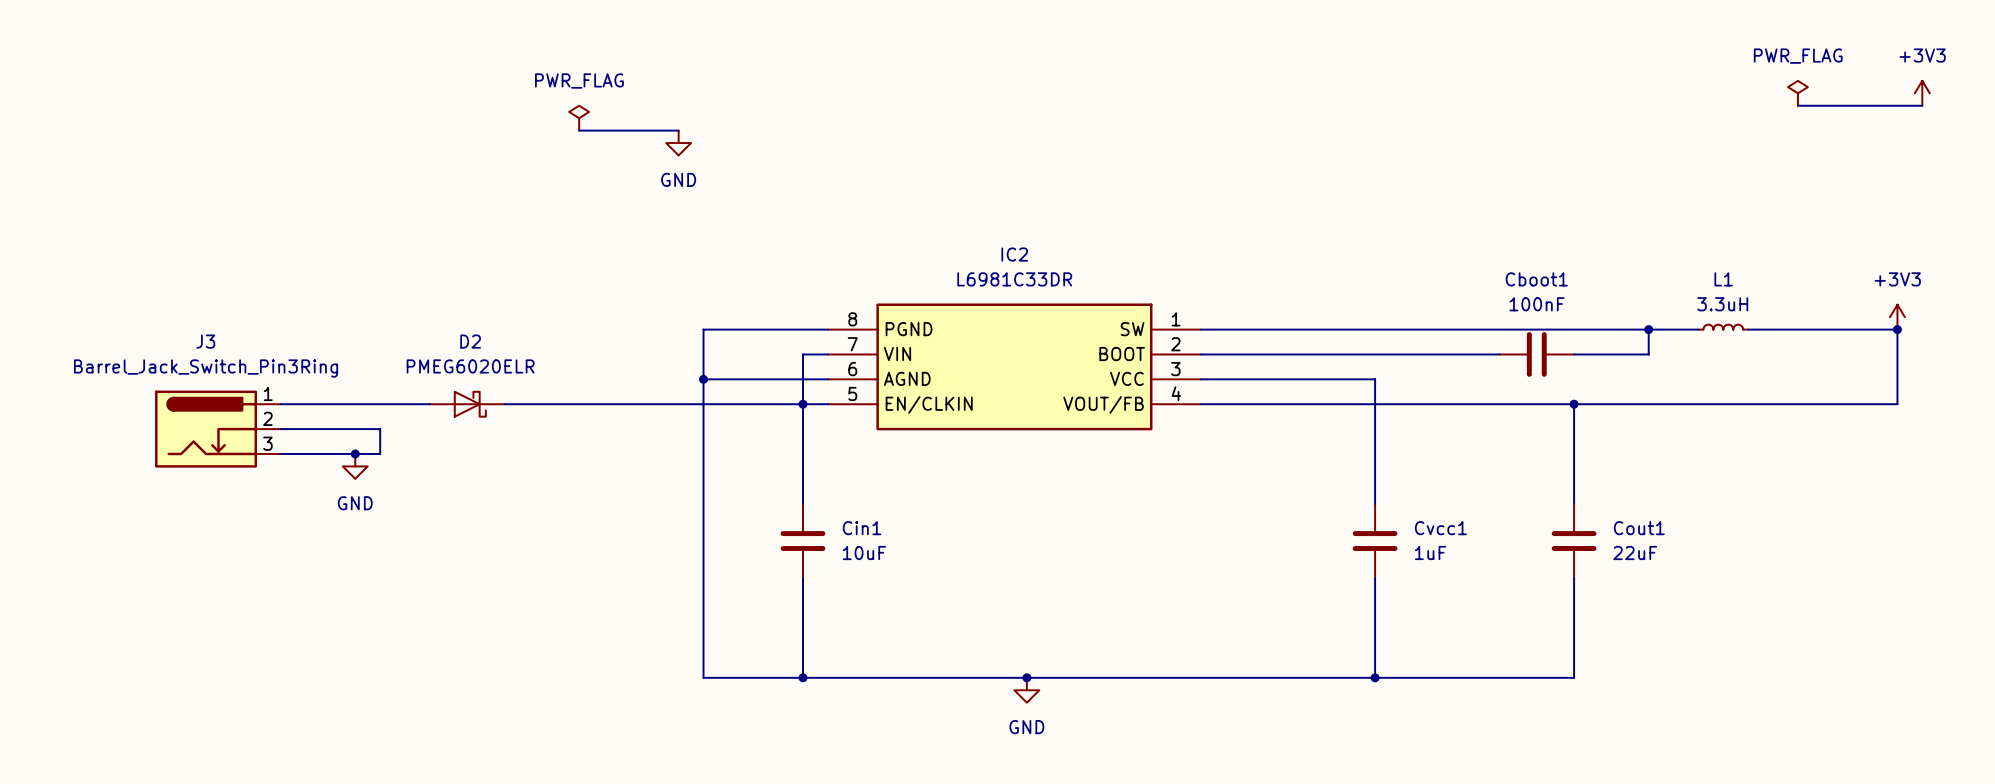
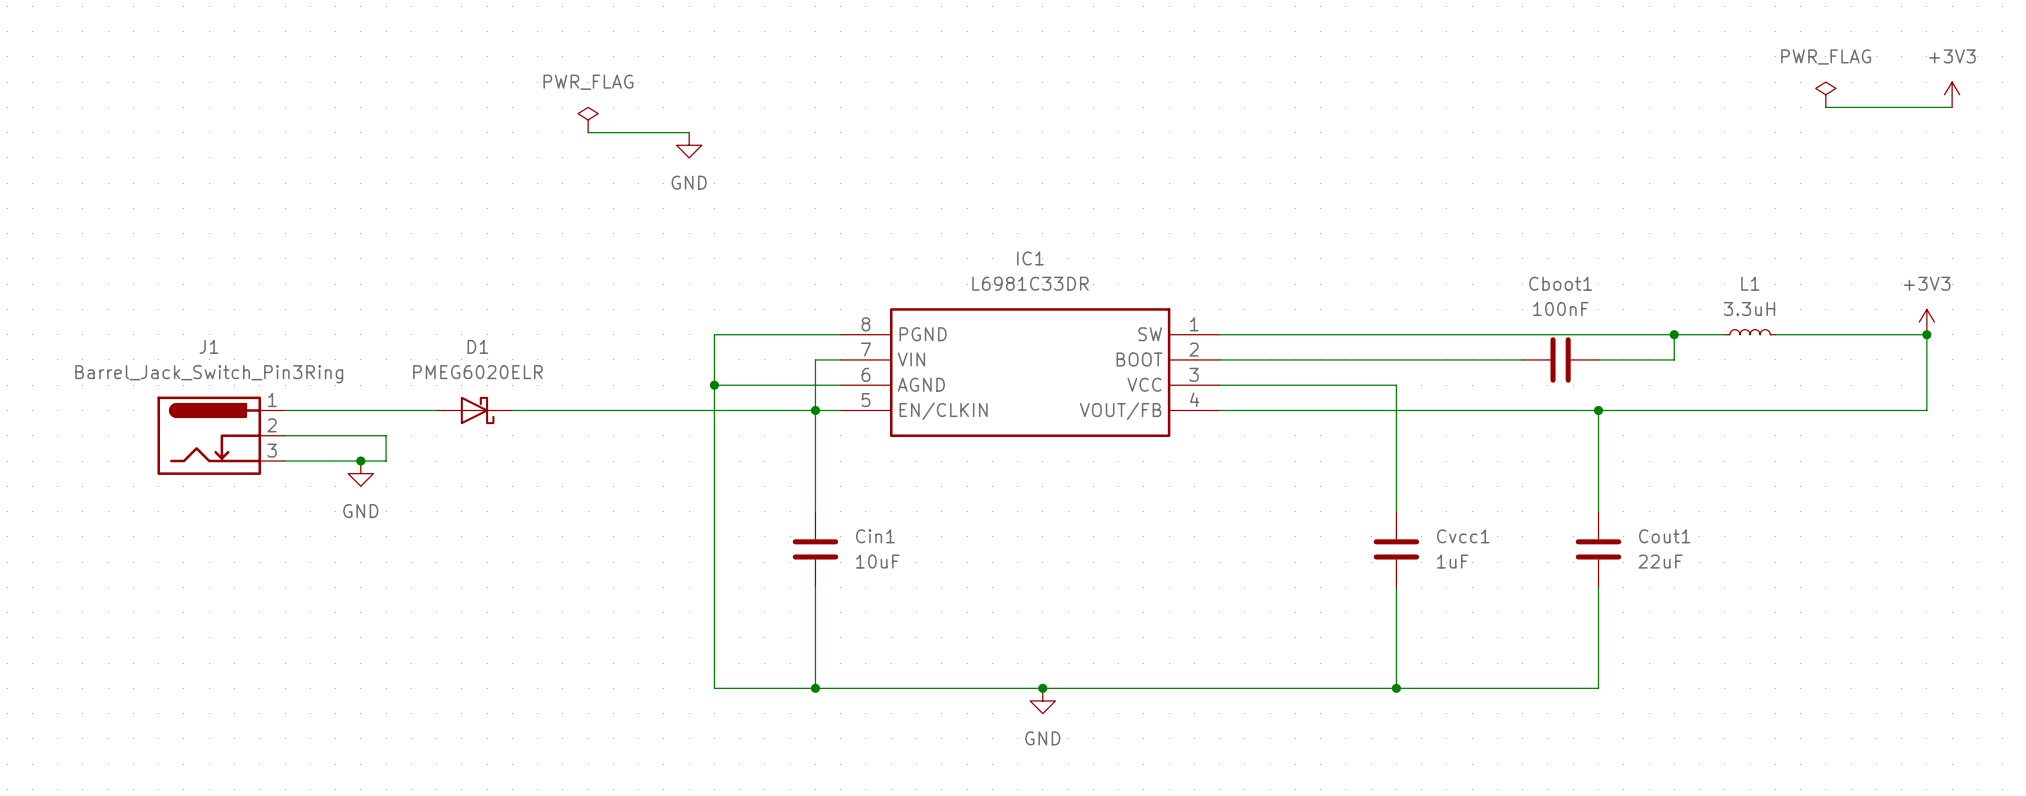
IC2 name: IC2 (1014, 254) -> IC1 (1030, 258)
J3 name: J3 (205, 341) -> J1 (208, 346)
D2 name: D2 (470, 341) -> D1 (477, 346)

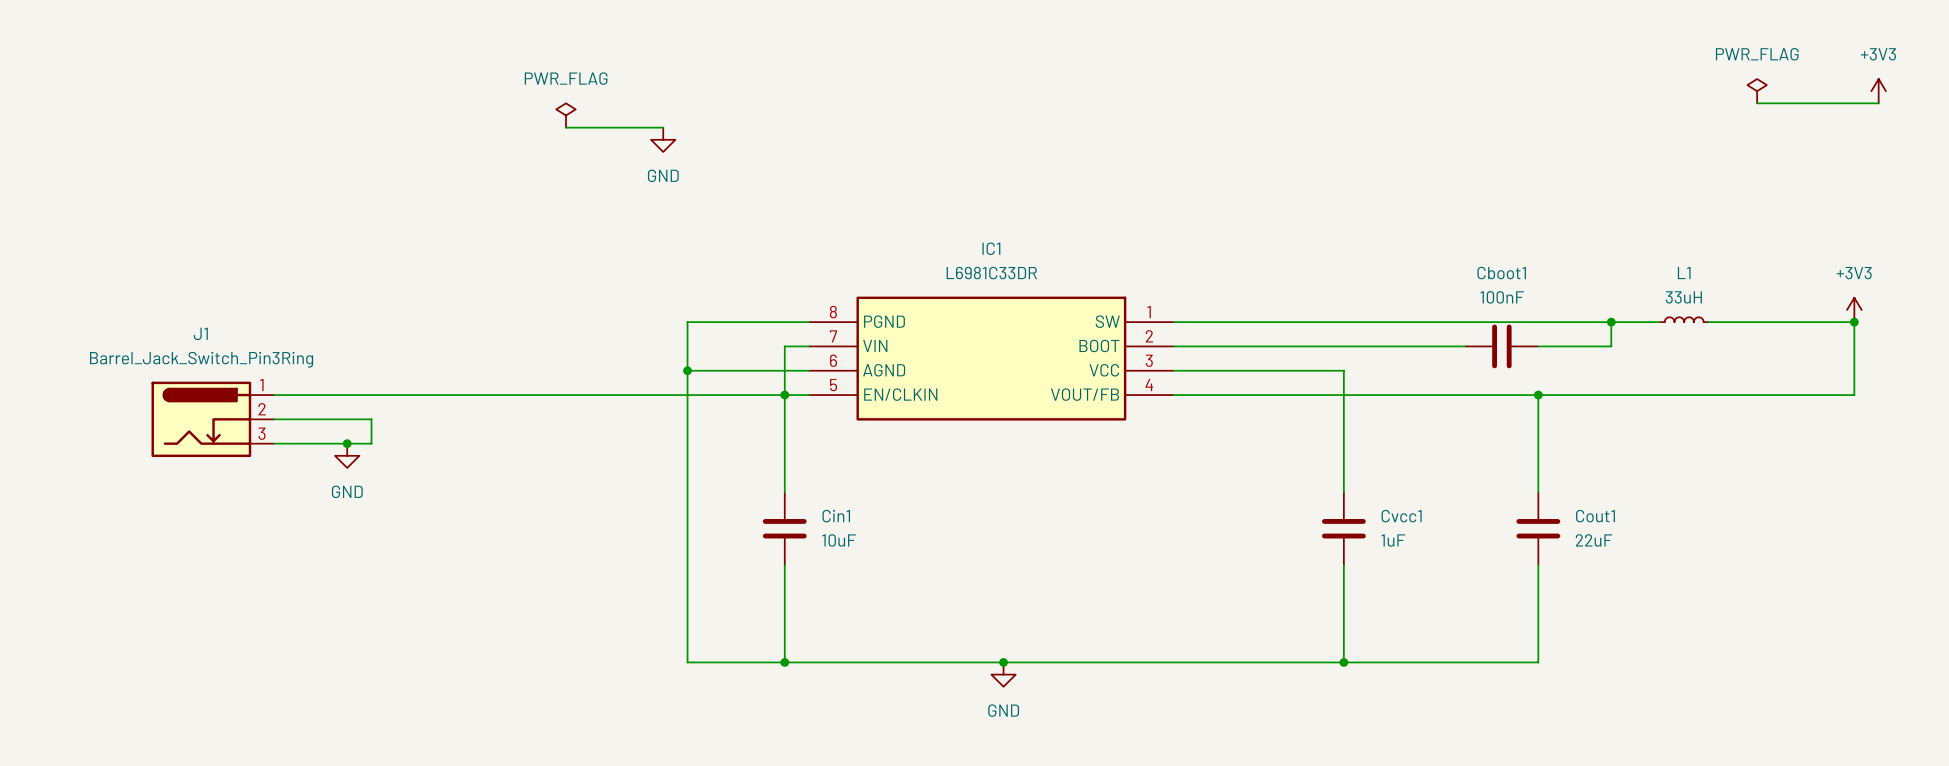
L1 value: 3.3uH (1749, 308) -> 33uH (1683, 297)
D1: PMEG6020ELR (474, 410) -> none

